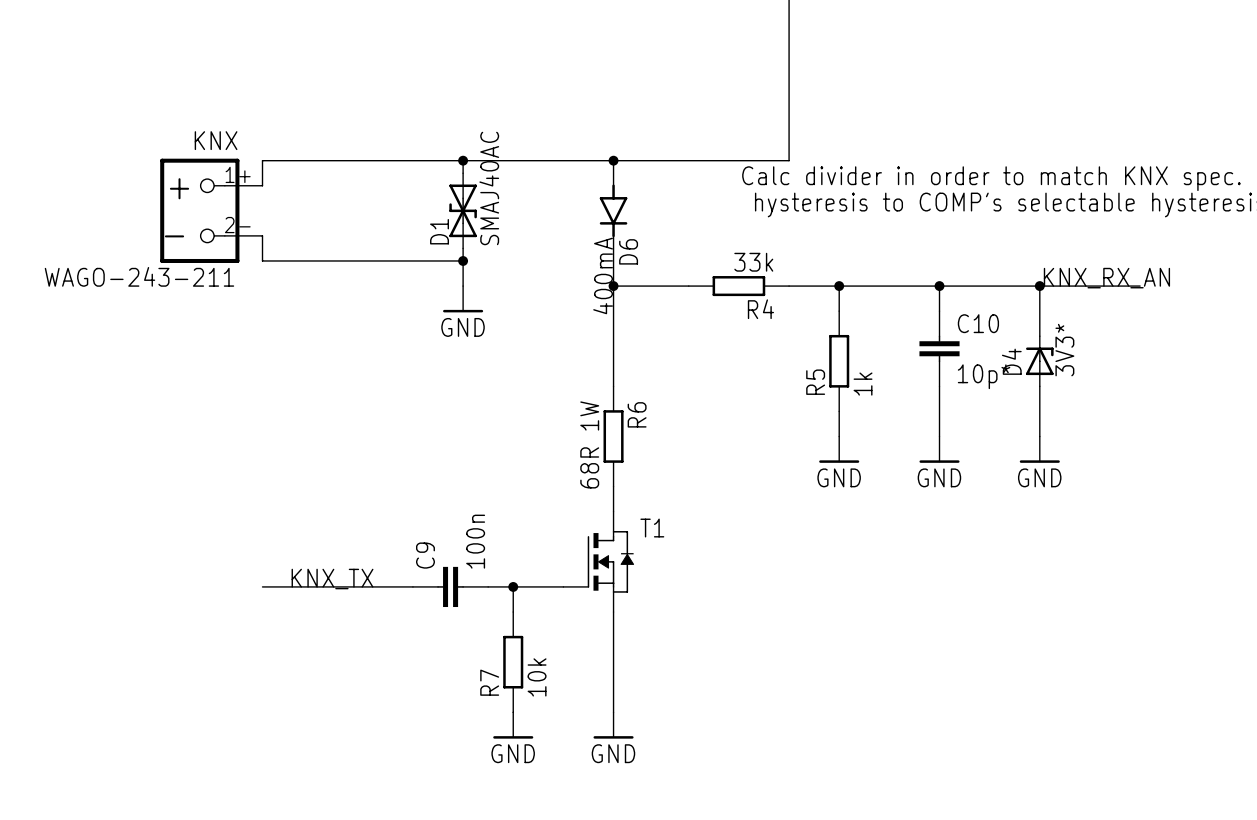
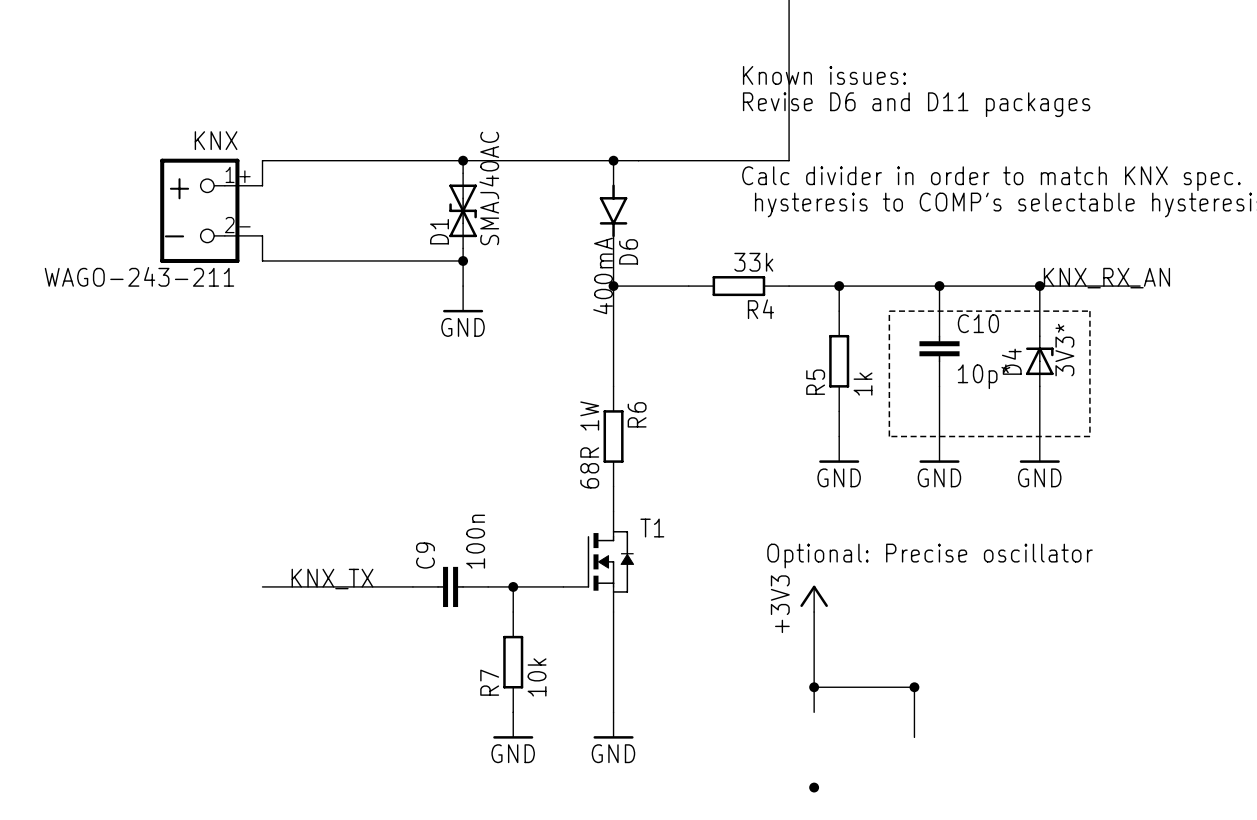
text: none -> Known issues: (824, 75)
text: none -> Revise D6 and D11 packages (916, 104)
line: none -> (889, 311) (1089, 311) (1089, 436) (889, 436) (889, 311)
text: none -> Optional: Precise oscillator (930, 556)
power symbol: none -> +3V3 (814, 598)
wire: none -> (814, 612) (814, 712)
wire: none -> (814, 687) (914, 687) (914, 737)
junction: none -> (814, 687)
junction: none -> (914, 687)
junction: none -> (814, 787)

